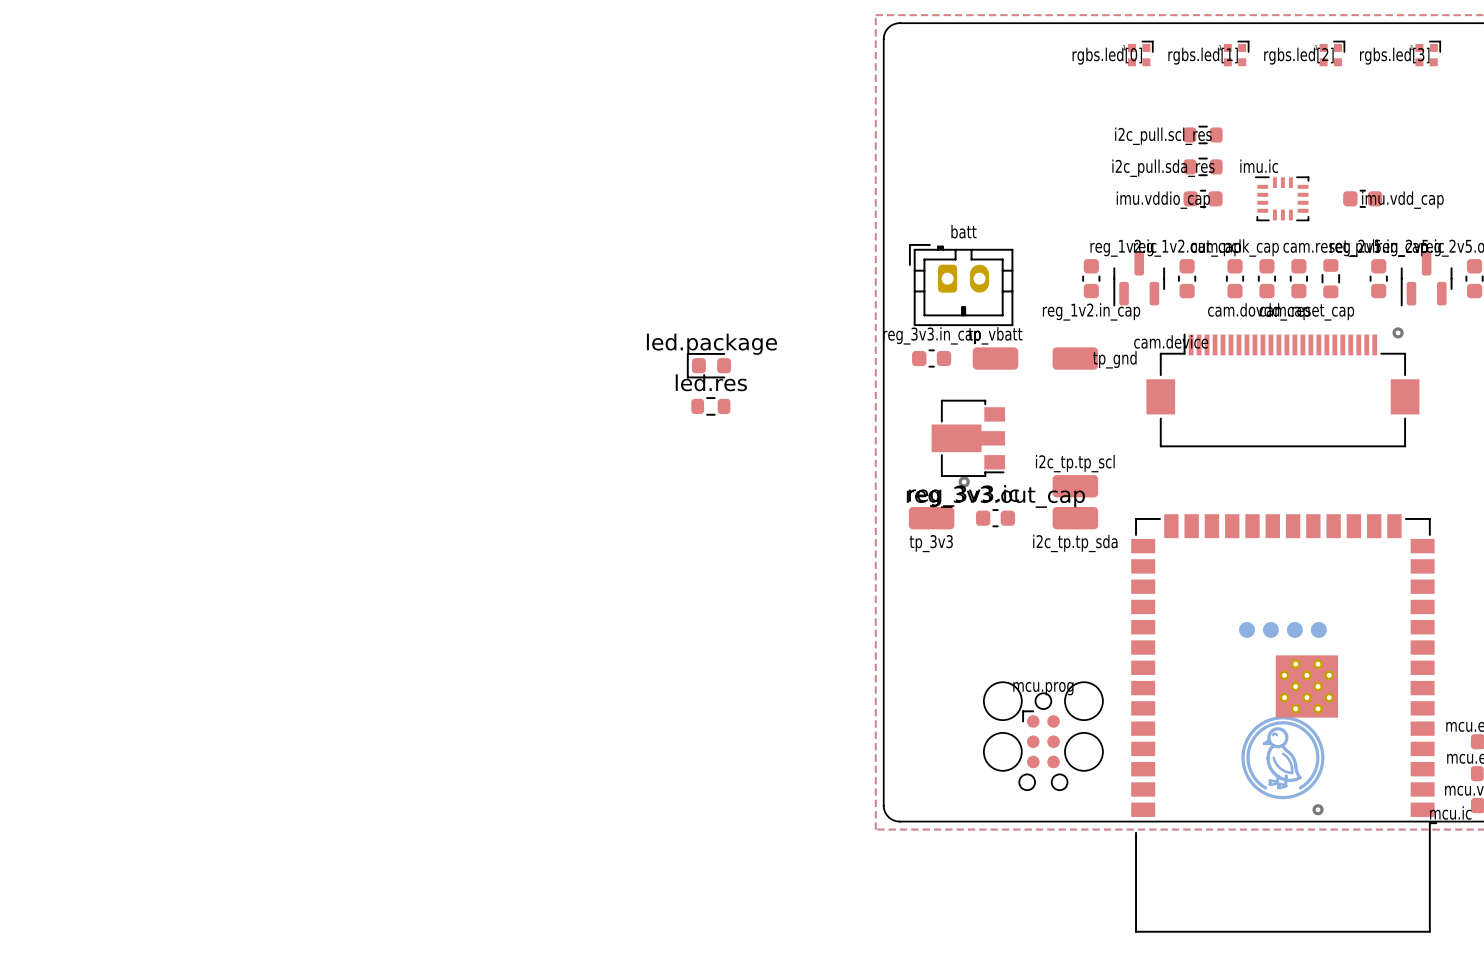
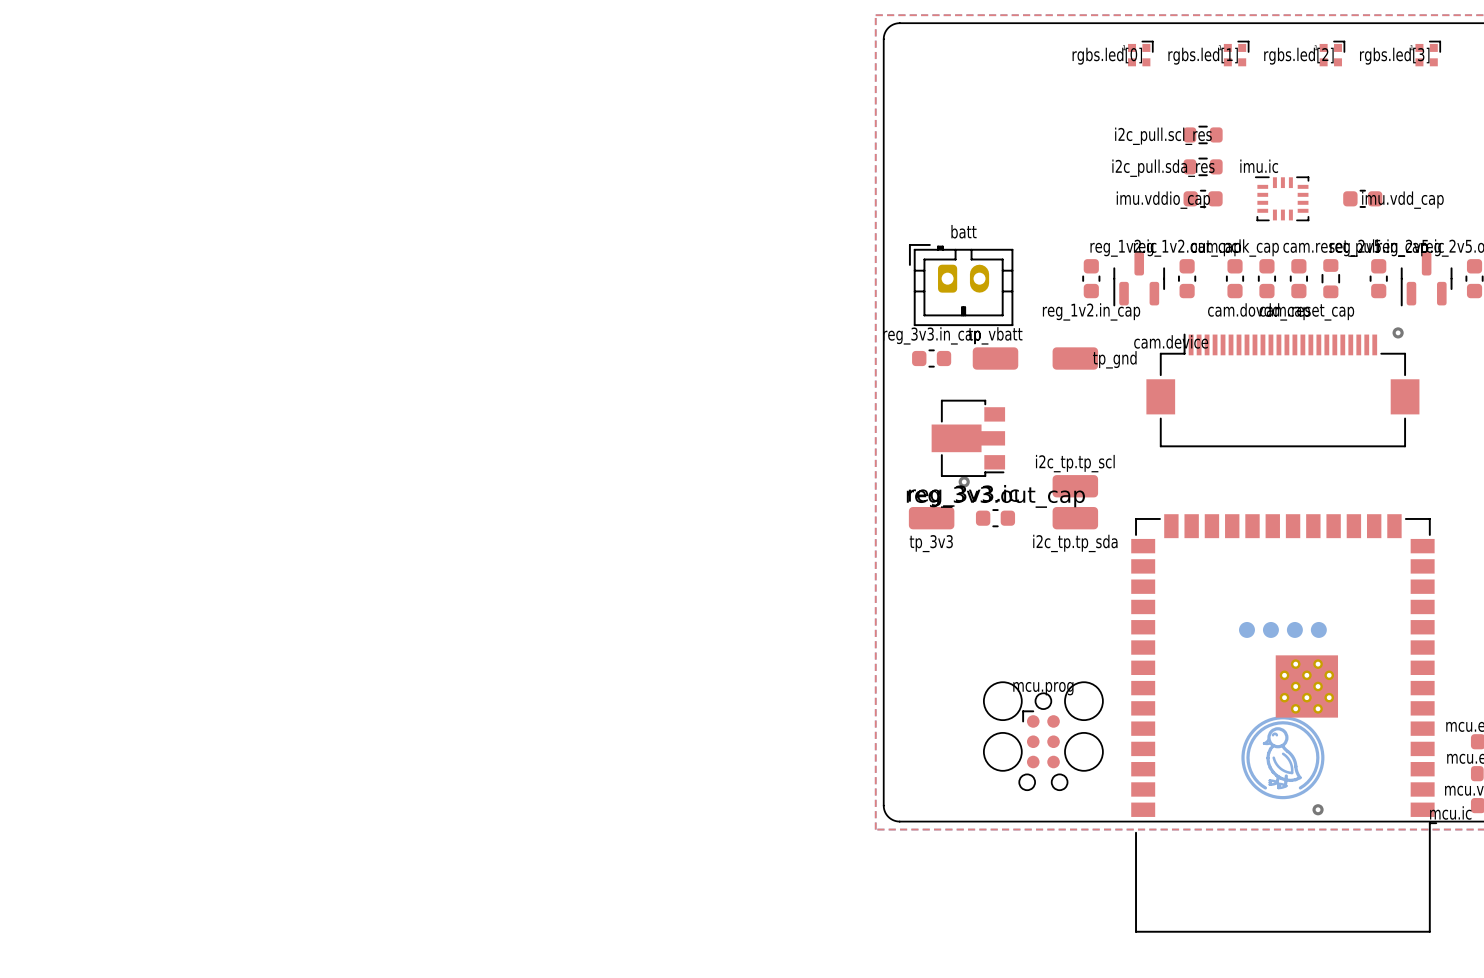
led.package: (708, 365) -> none
led.res: (710, 406) -> none

